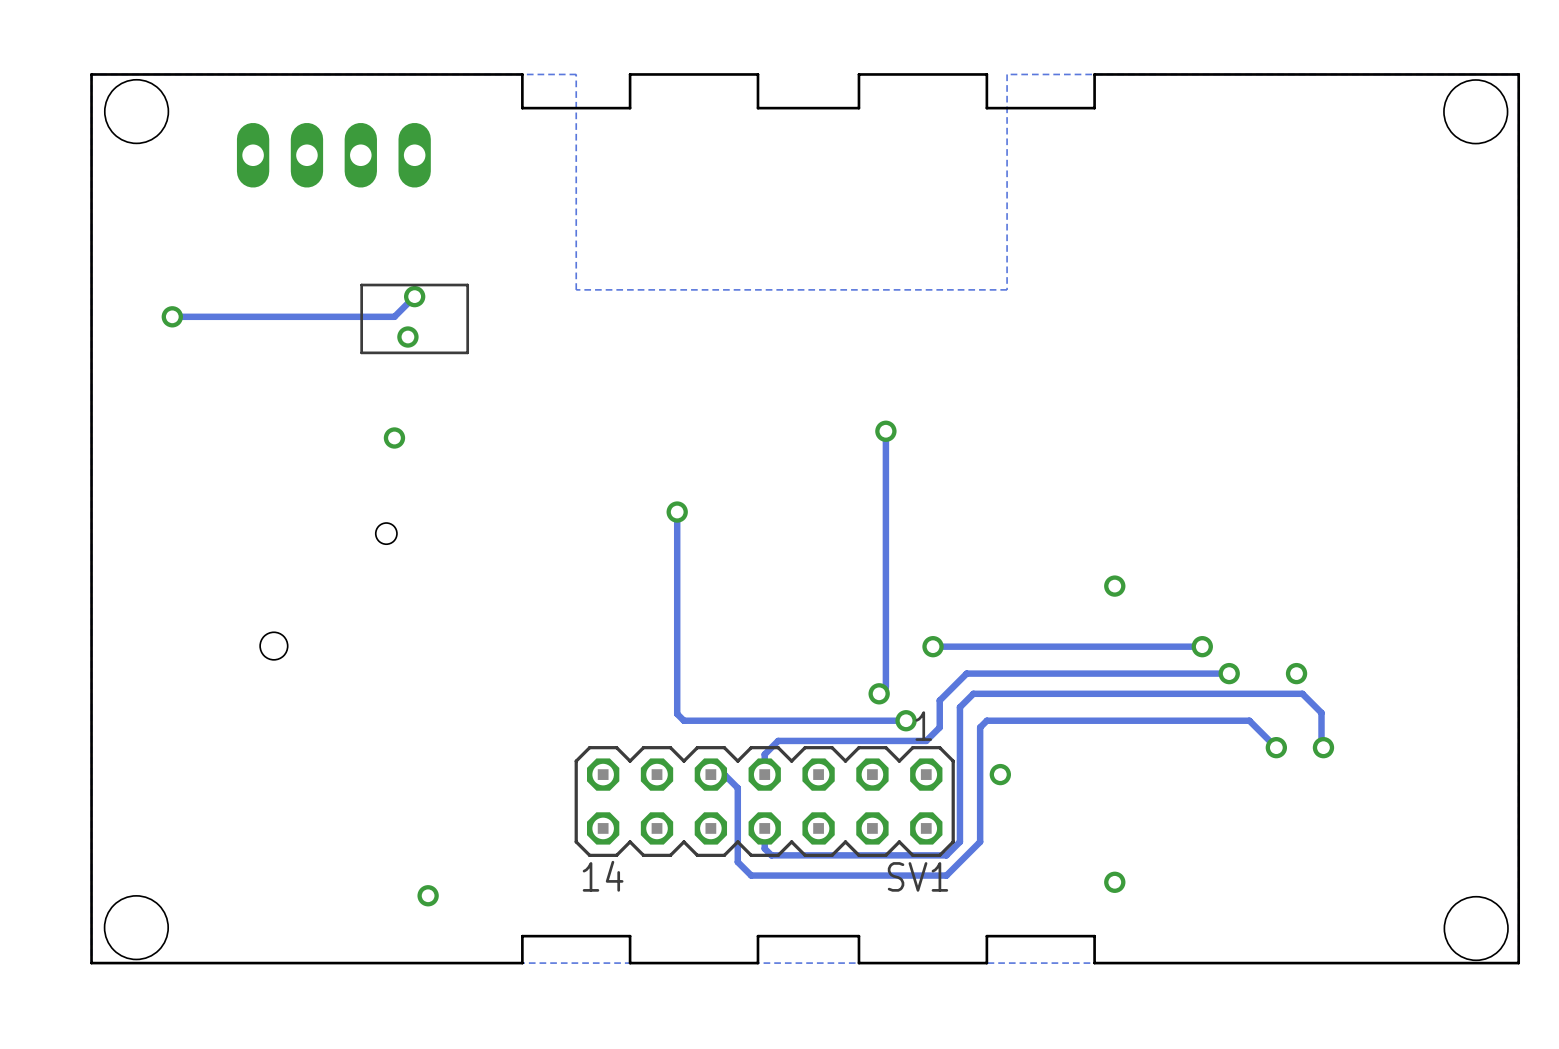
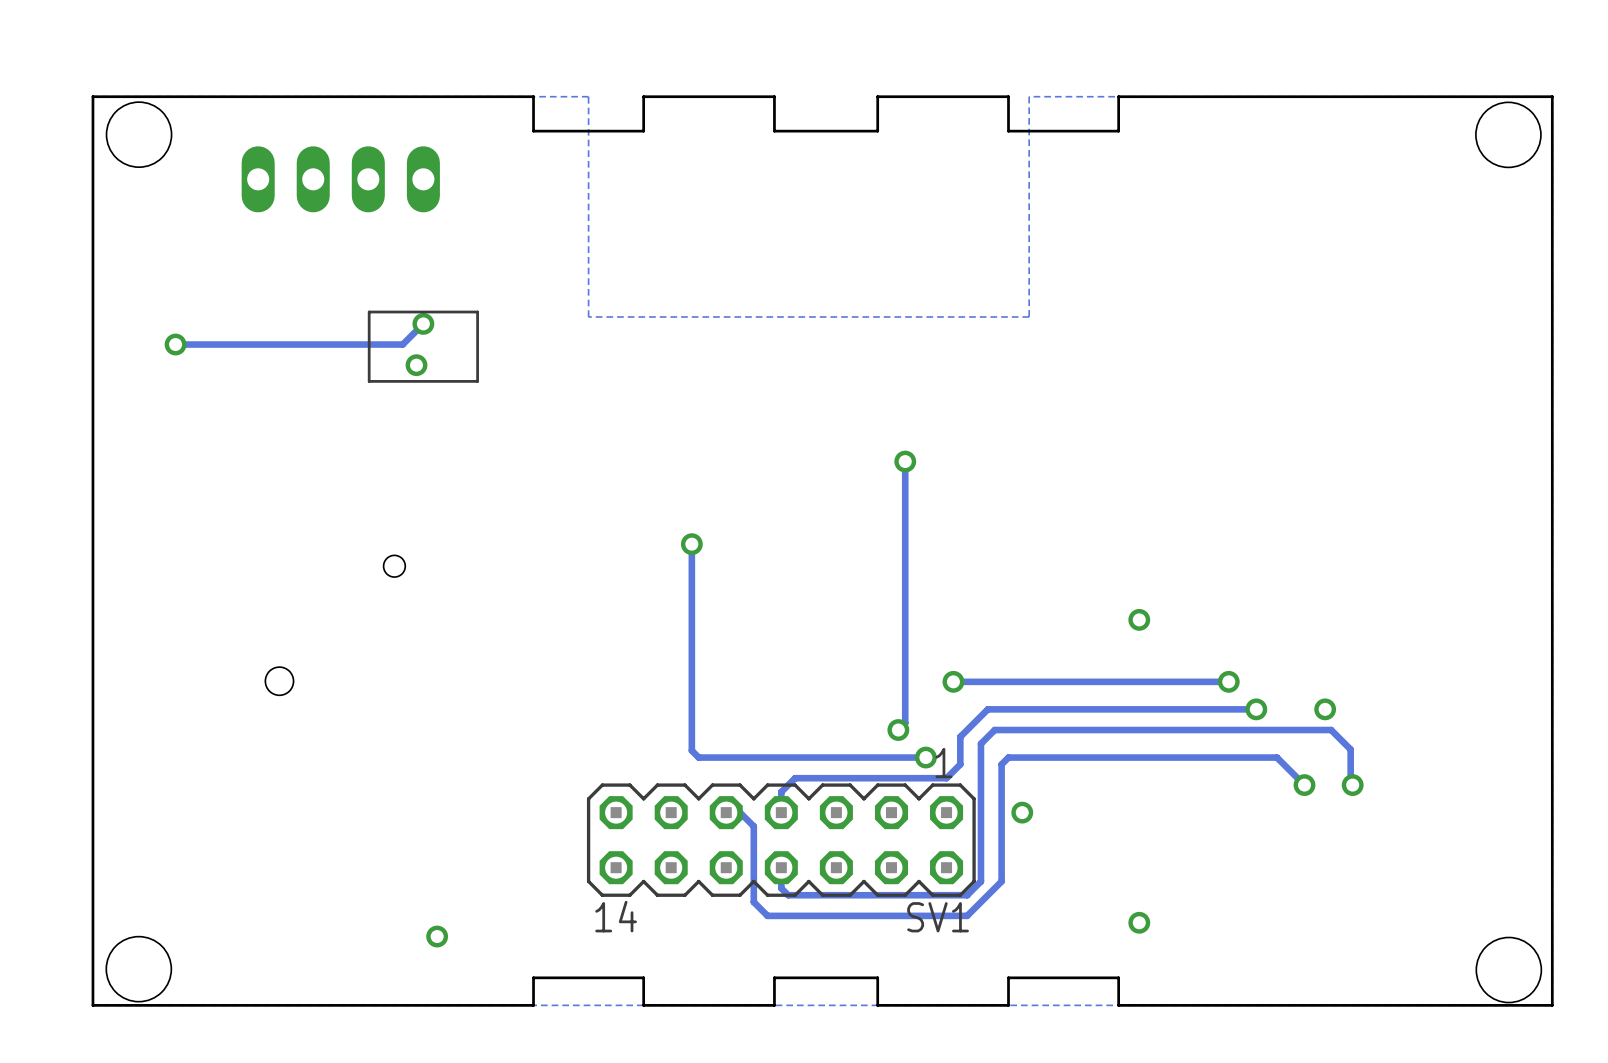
via: (394, 437) -> none

